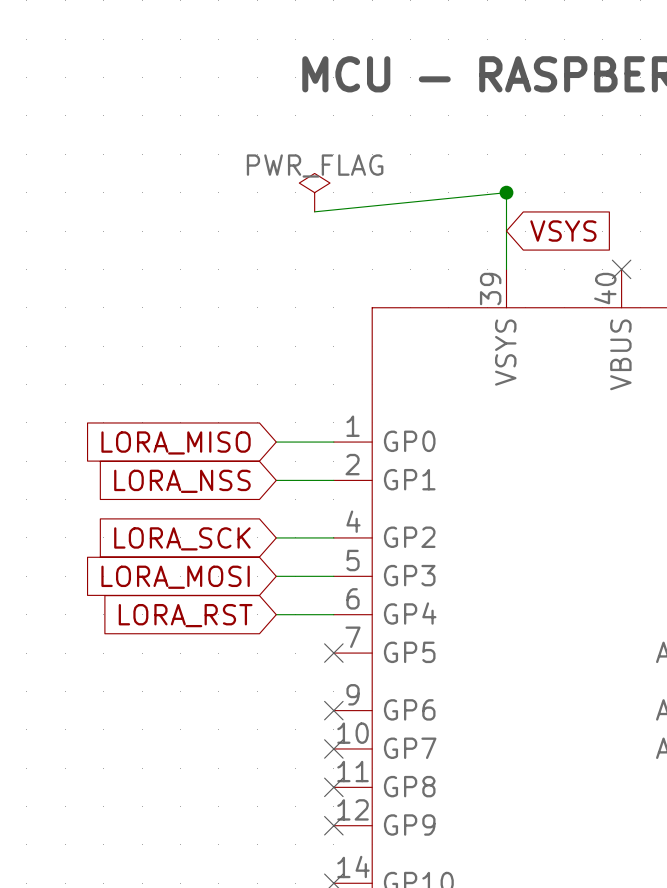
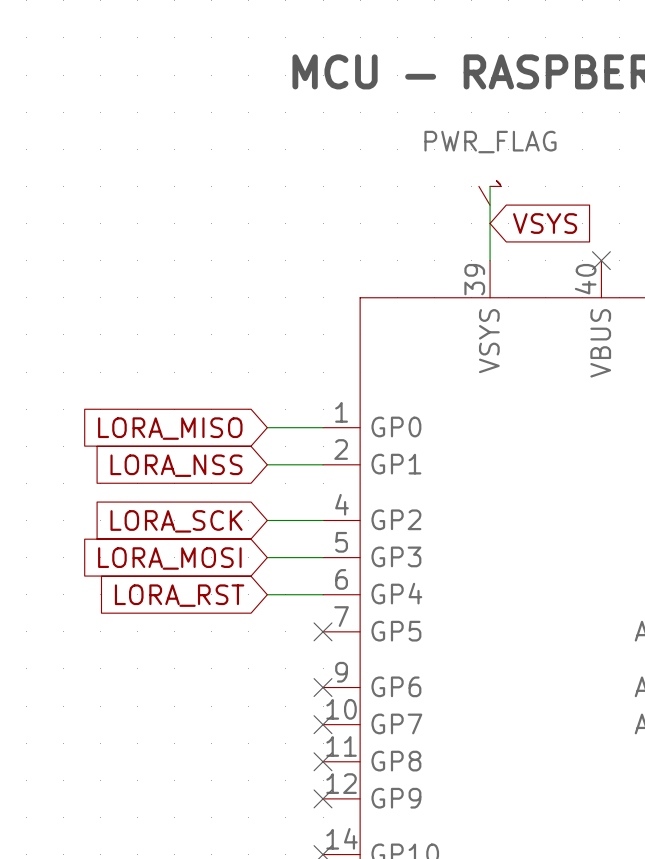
power symbol: PWR_FLAG (314, 192) -> none
wire: (506, 192) (314, 211) -> none
junction: (506, 192) -> none
power symbol: none -> PWR_FLAG (490, 192)

